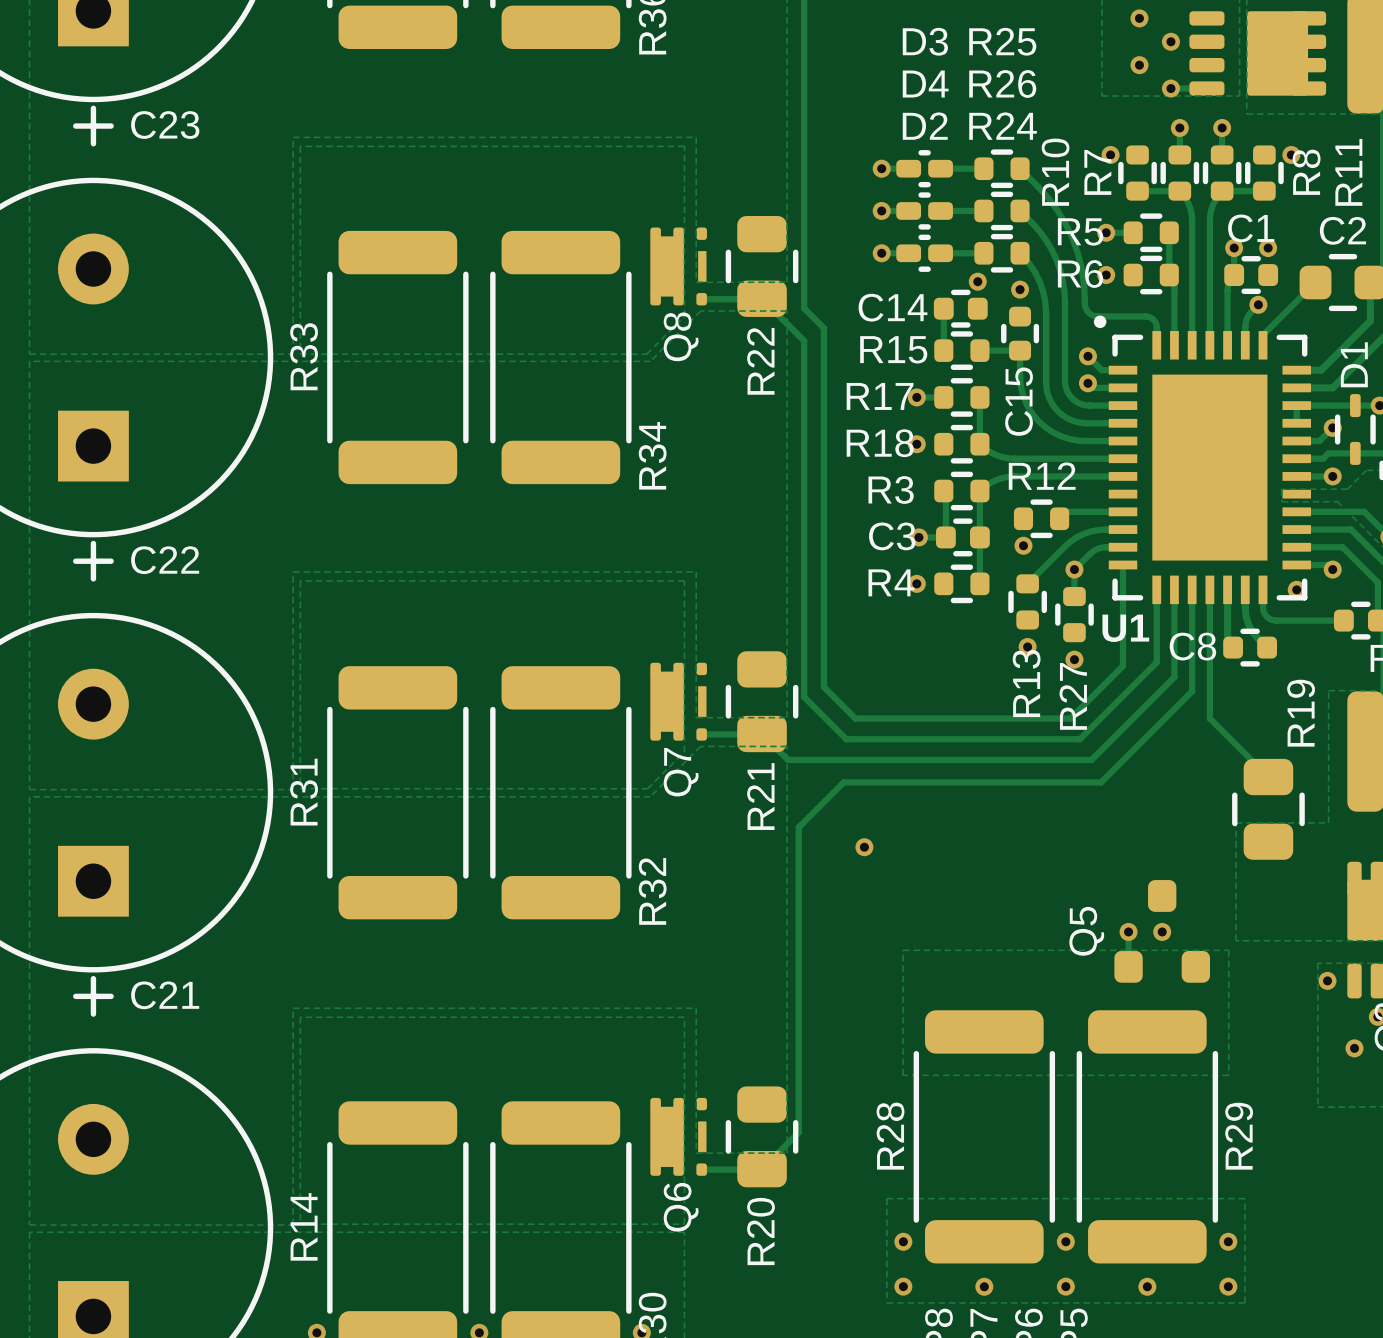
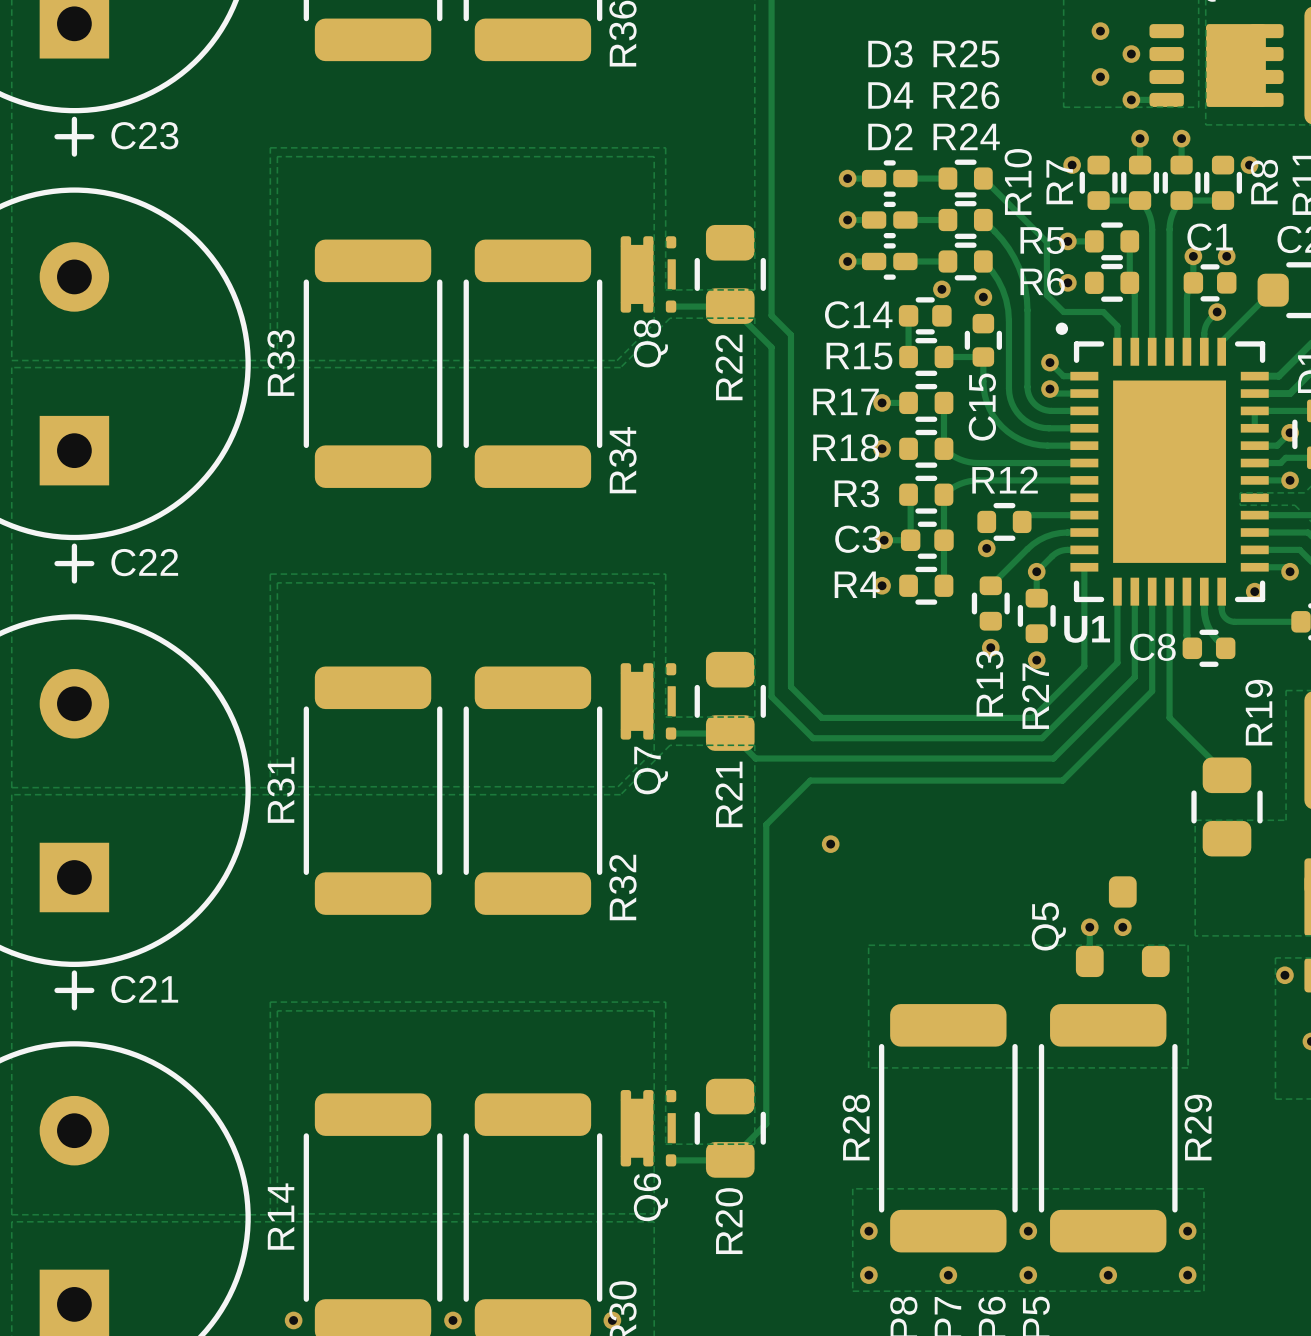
track: (1037, 186) (1057, 210) (1072, 238) (1081, 268) (1084, 304) (1087, 311) (1096, 316) (1148, 316) (1154, 320) (1156, 327) -> (1000, 195) (1046, 242) (1046, 295) (1063, 311) (1103, 311) (1117, 326) (1117, 334)

